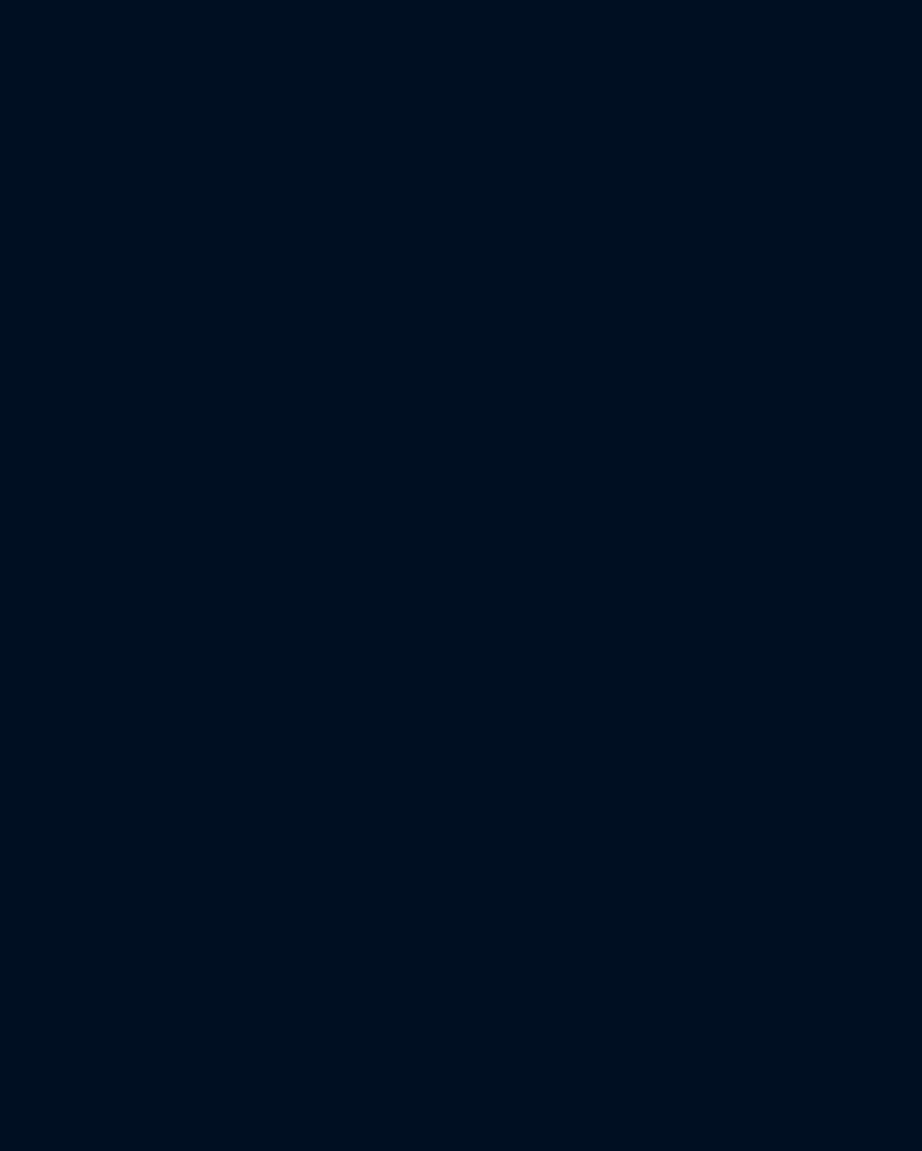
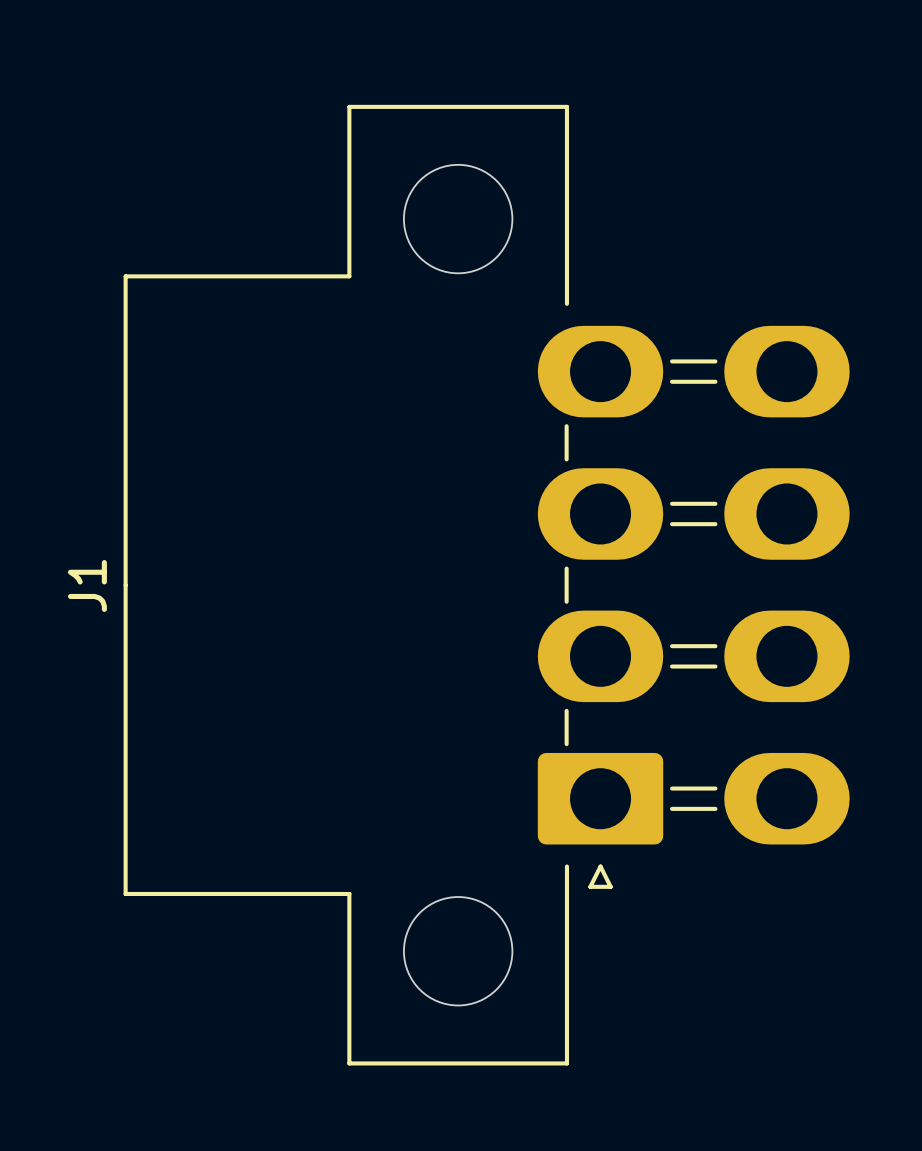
J1: none -> (486, 585)

